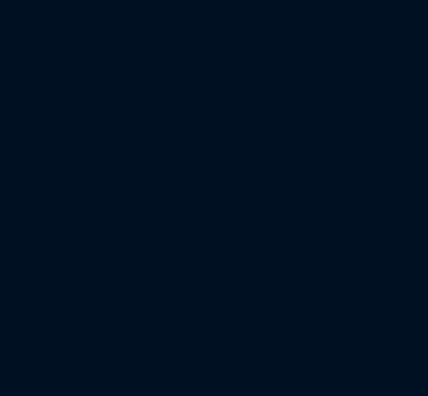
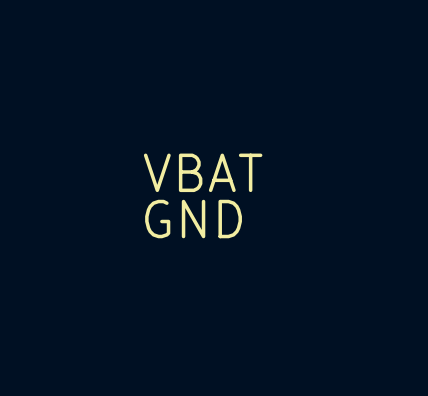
text: none -> VBAT (203, 172)
text: none -> GND (193, 219)

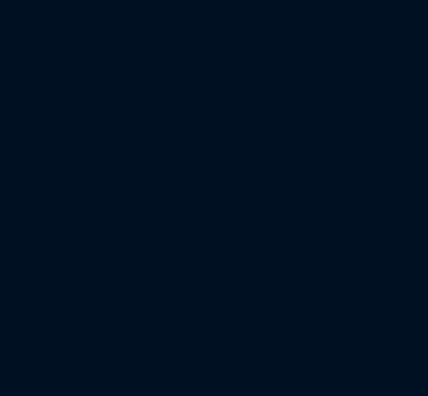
text: VBAT (203, 172) -> none
text: GND (193, 219) -> none

